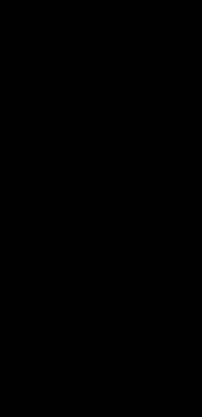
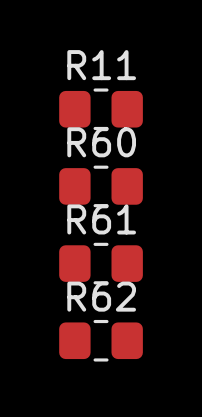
R11: none -> (101, 109)
R60: none -> (101, 186)
R61: none -> (101, 263)
R62: none -> (101, 340)

